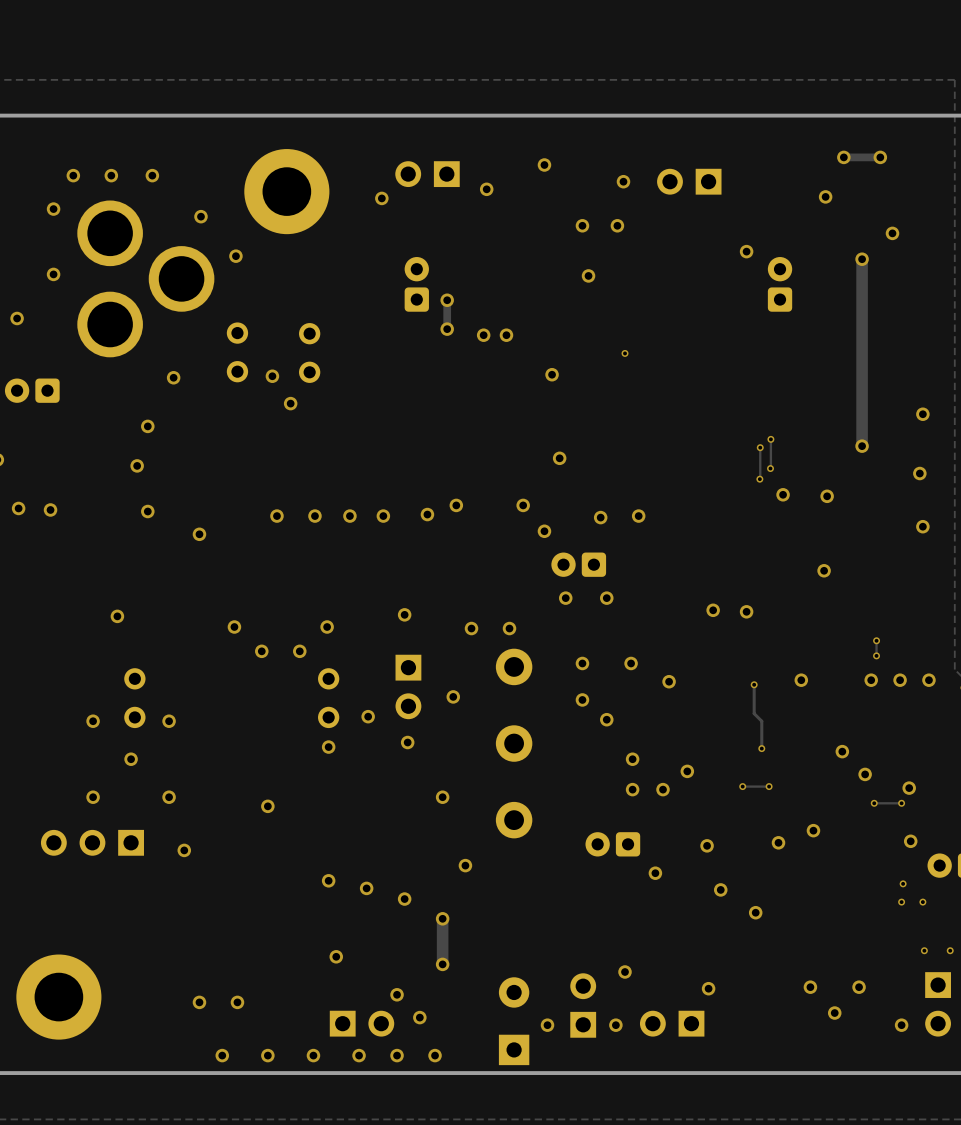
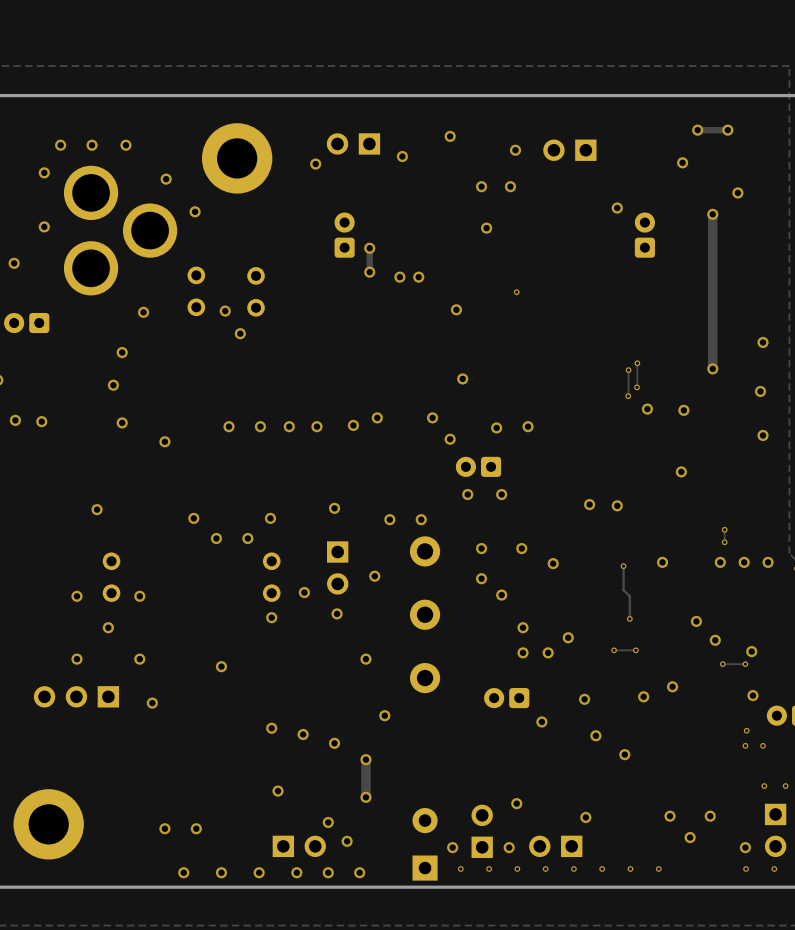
via: none -> (460, 868)
via: none -> (489, 868)
via: none -> (517, 868)
via: none -> (545, 868)
via: none -> (573, 868)
via: none -> (602, 868)
via: none -> (630, 868)
via: none -> (658, 868)
via: none -> (746, 868)
via: none -> (774, 868)

